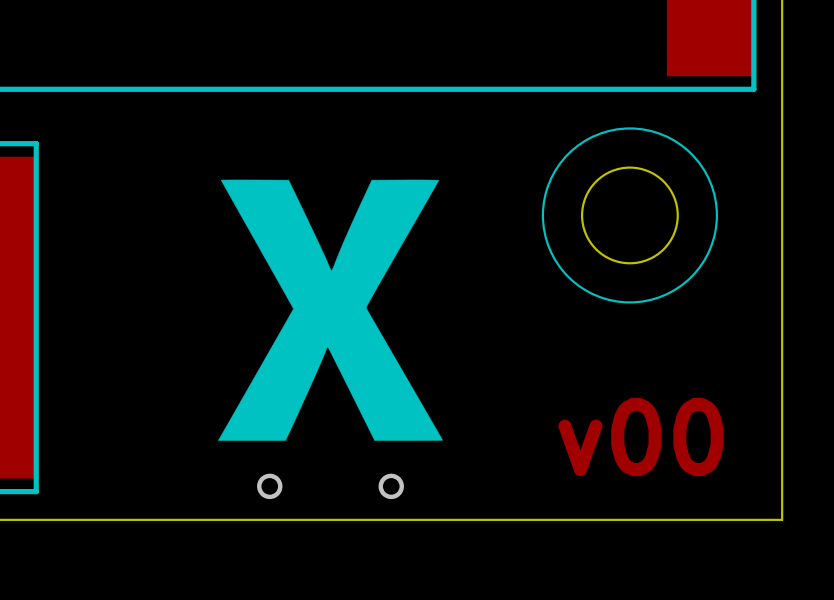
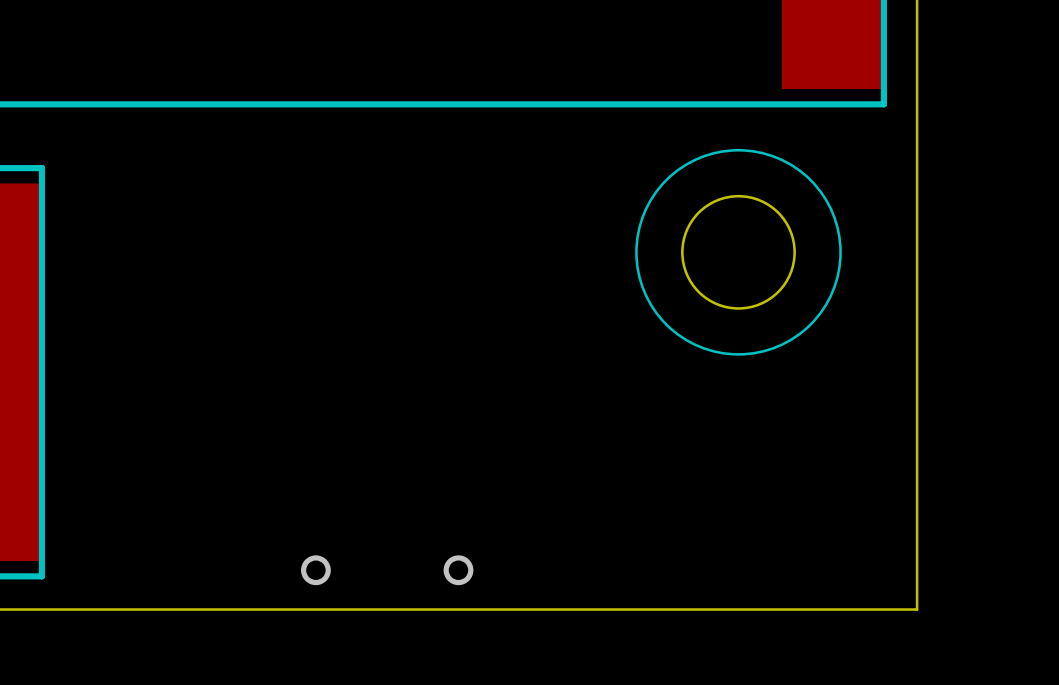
drawing: [218, 179, 443, 441] -> none
text: v00 (641, 437) -> none

